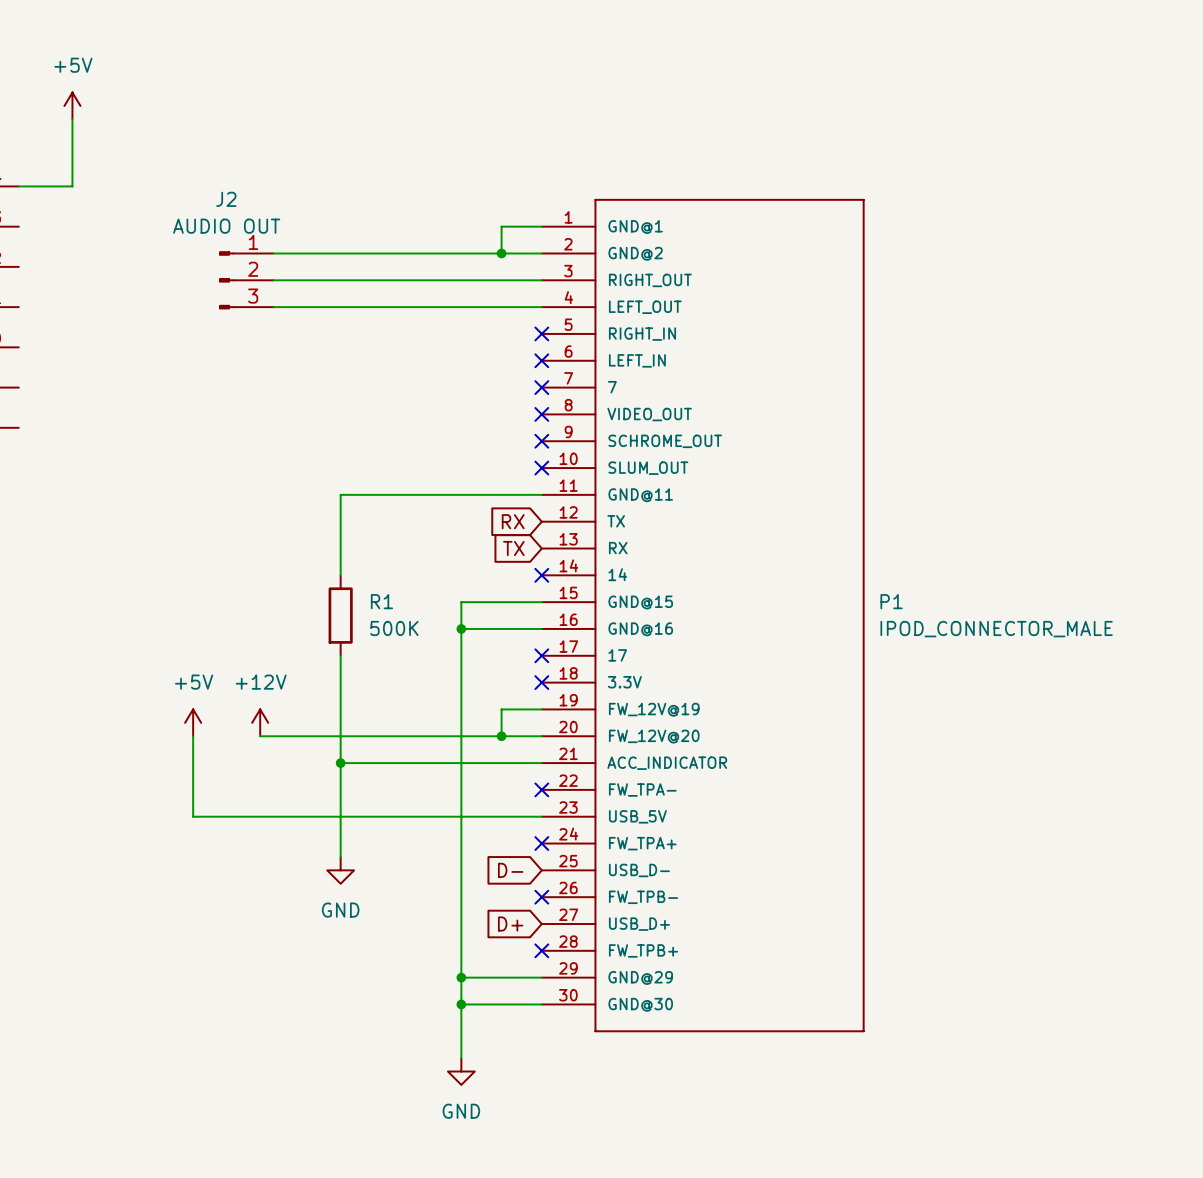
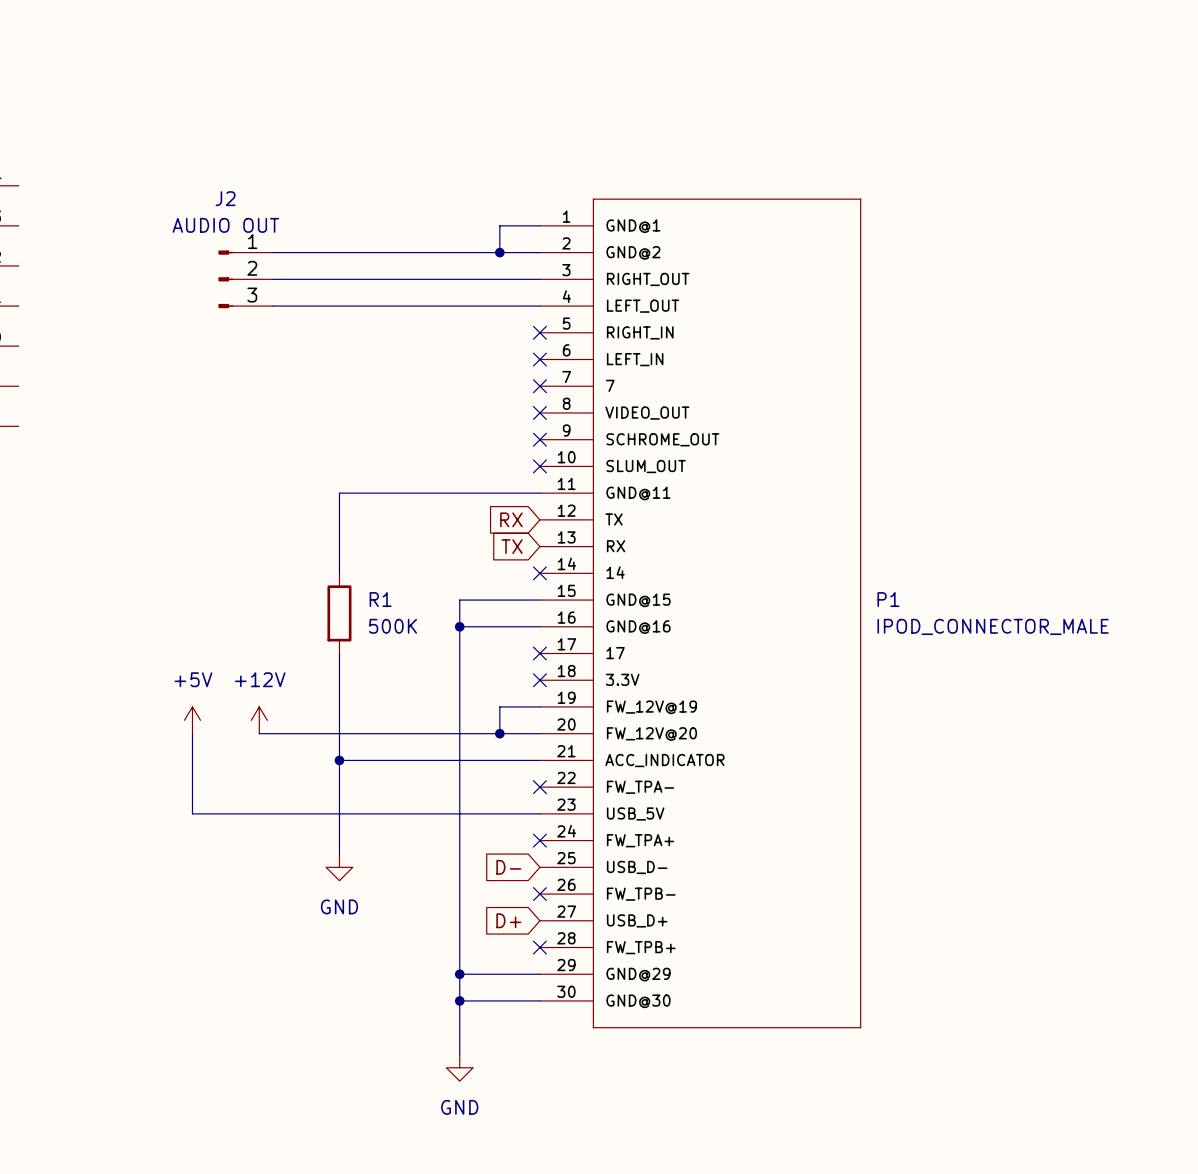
power symbol: +5V (72, 105) -> none
wire: (72, 119) (72, 186) (18, 186) -> none

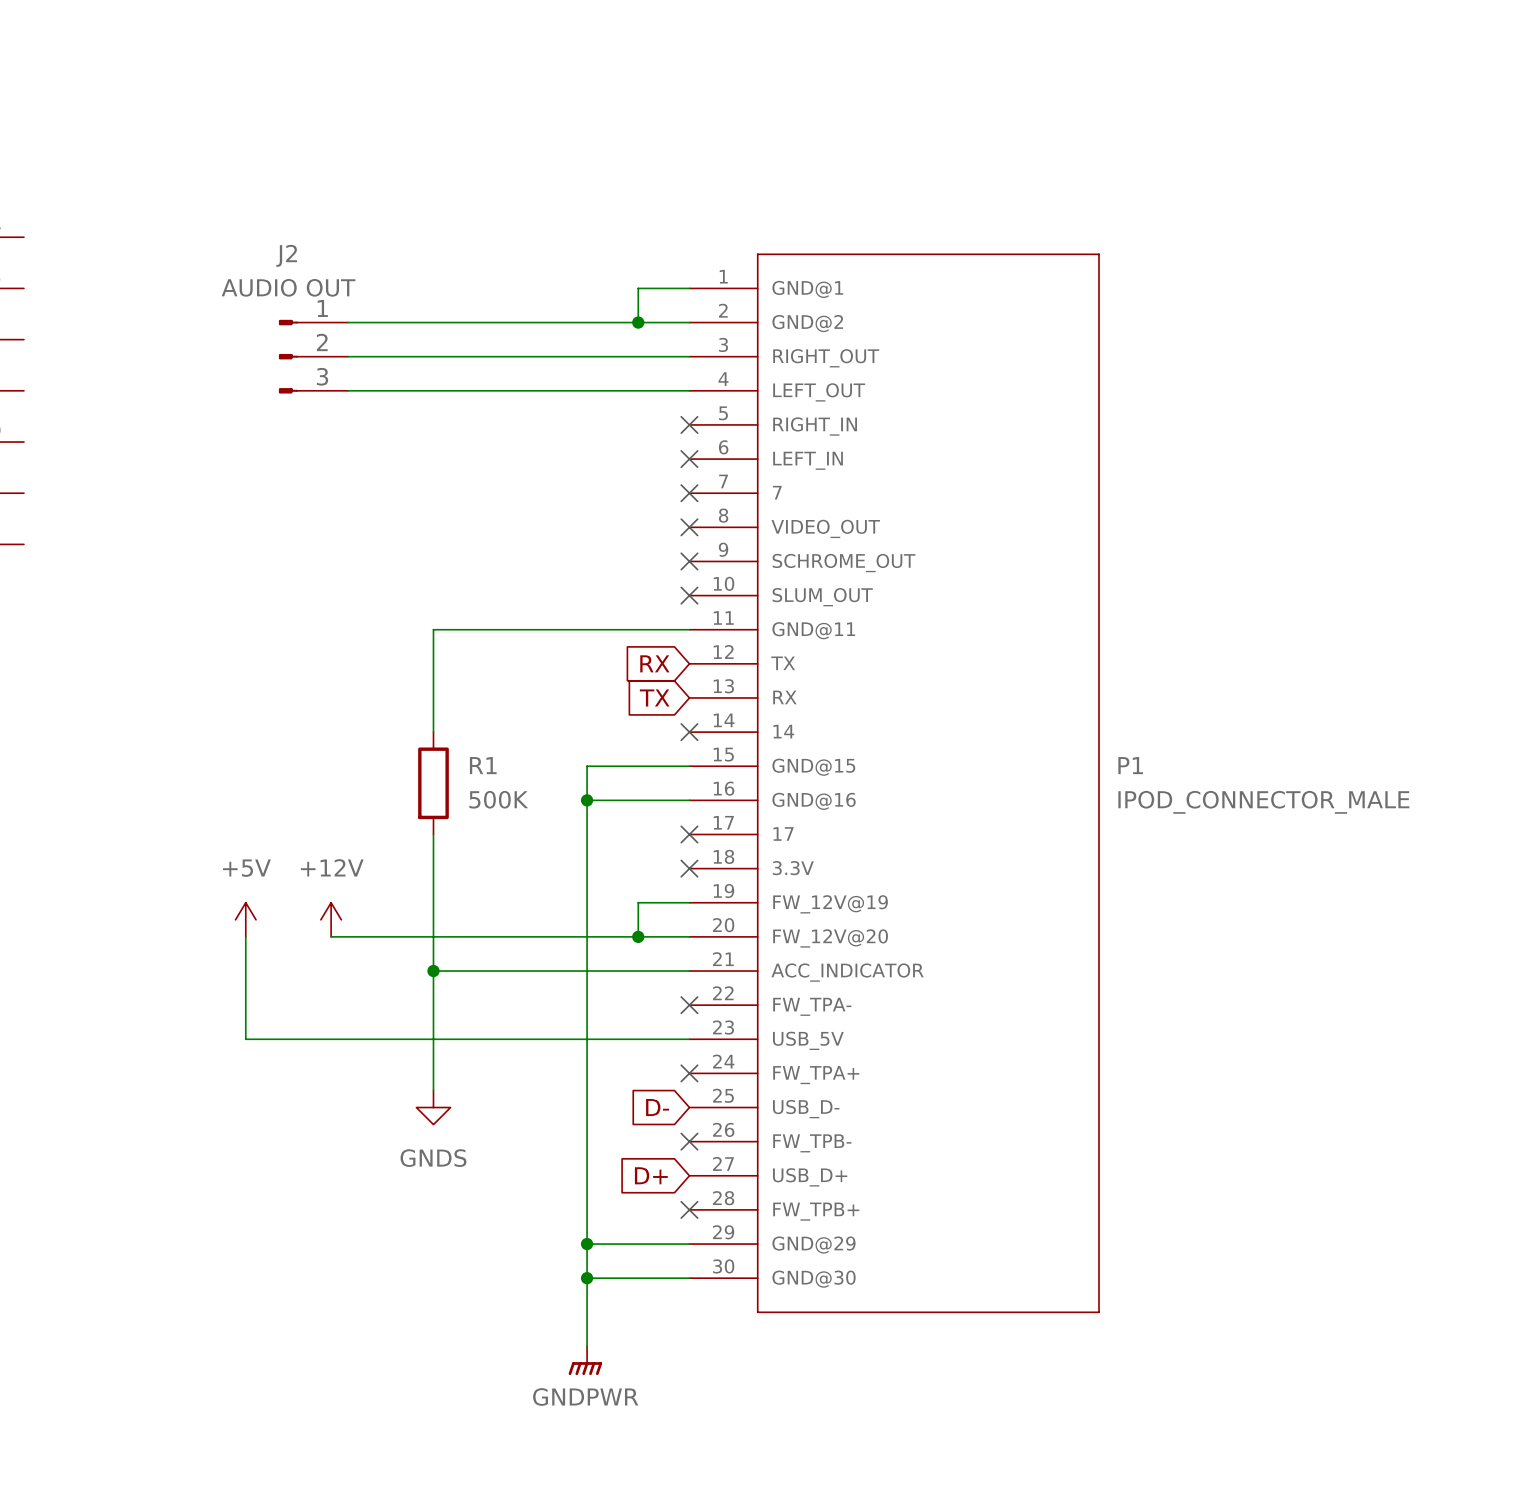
power symbol: GND (339, 867) -> GNDS (433, 1107)
power symbol: GND (459, 1067) -> GNDPWR (585, 1360)

